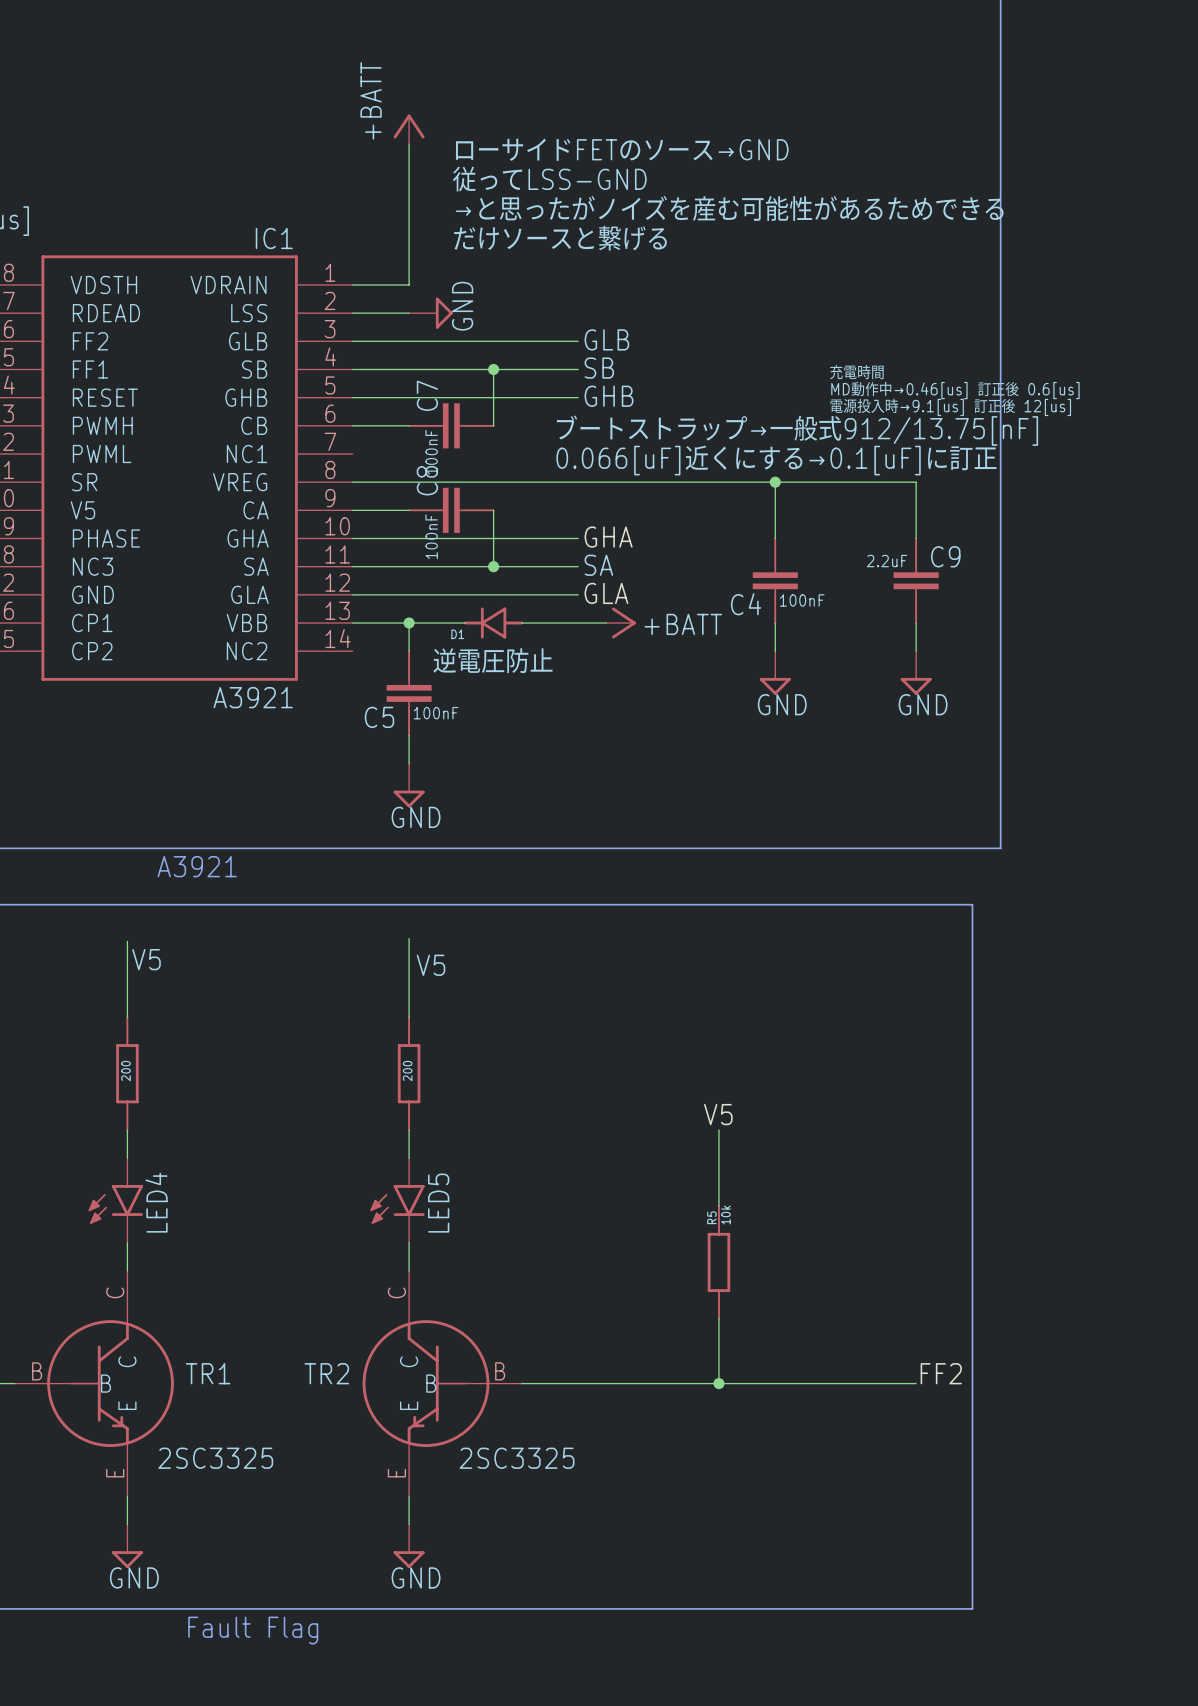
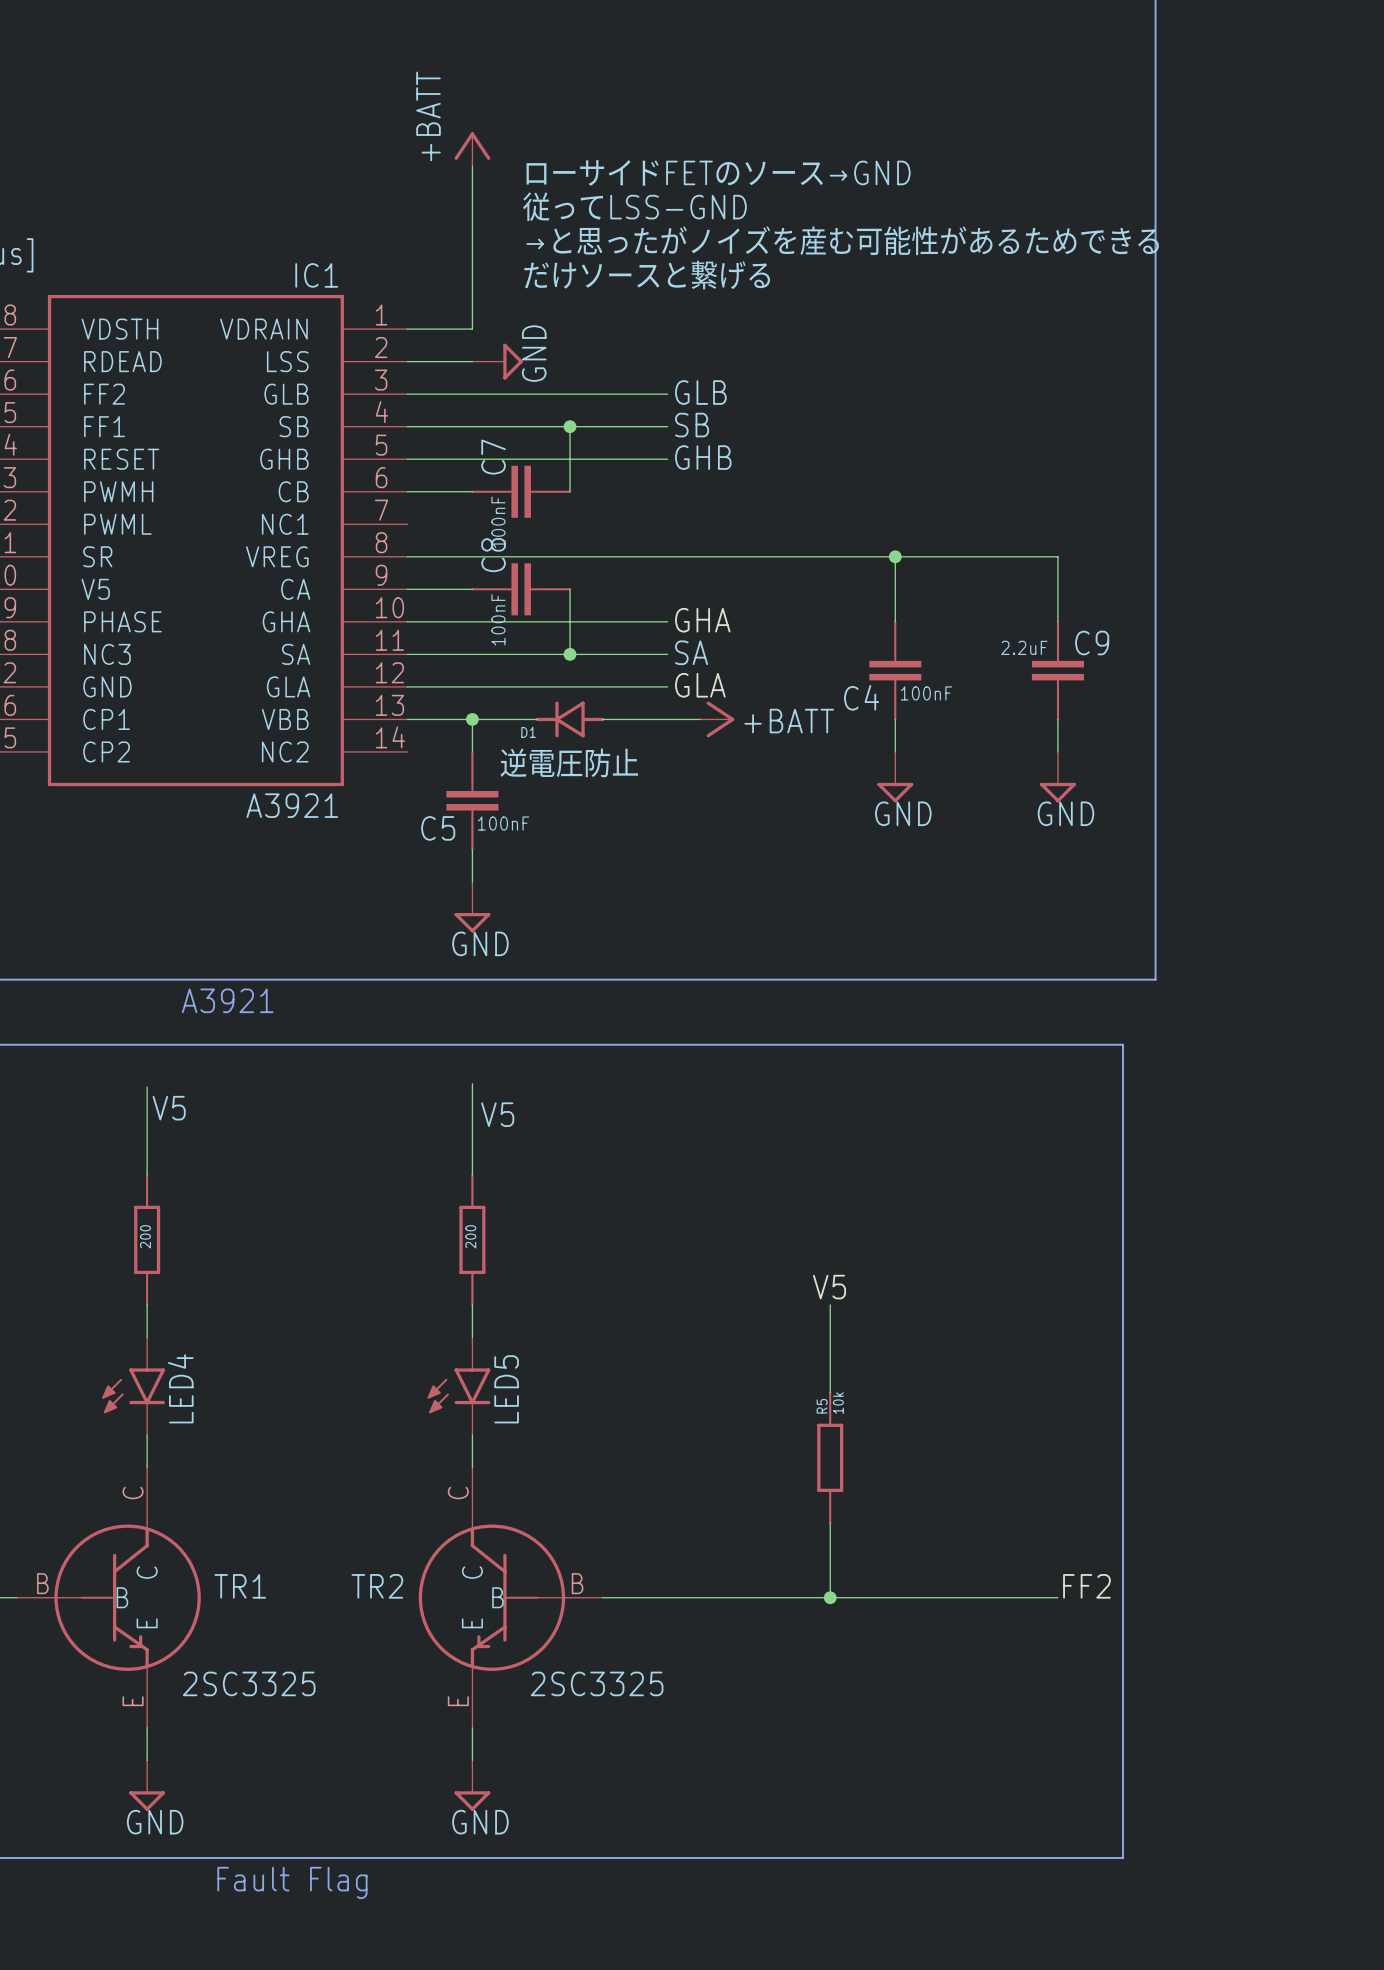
text: 充電時間 (856, 372) -> none
text: MD動作中→0.46[us] 訂正後 0.6[us] (955, 390) -> none
text: 電源投入時→9.1[us] 訂正後 12[us] (950, 407) -> none
text: ブートストラップ→一般式912/13.75[nF] (797, 430) -> none
text: 0.066[uF]近くにする→0.1[uF]に訂正 (776, 460) -> none

